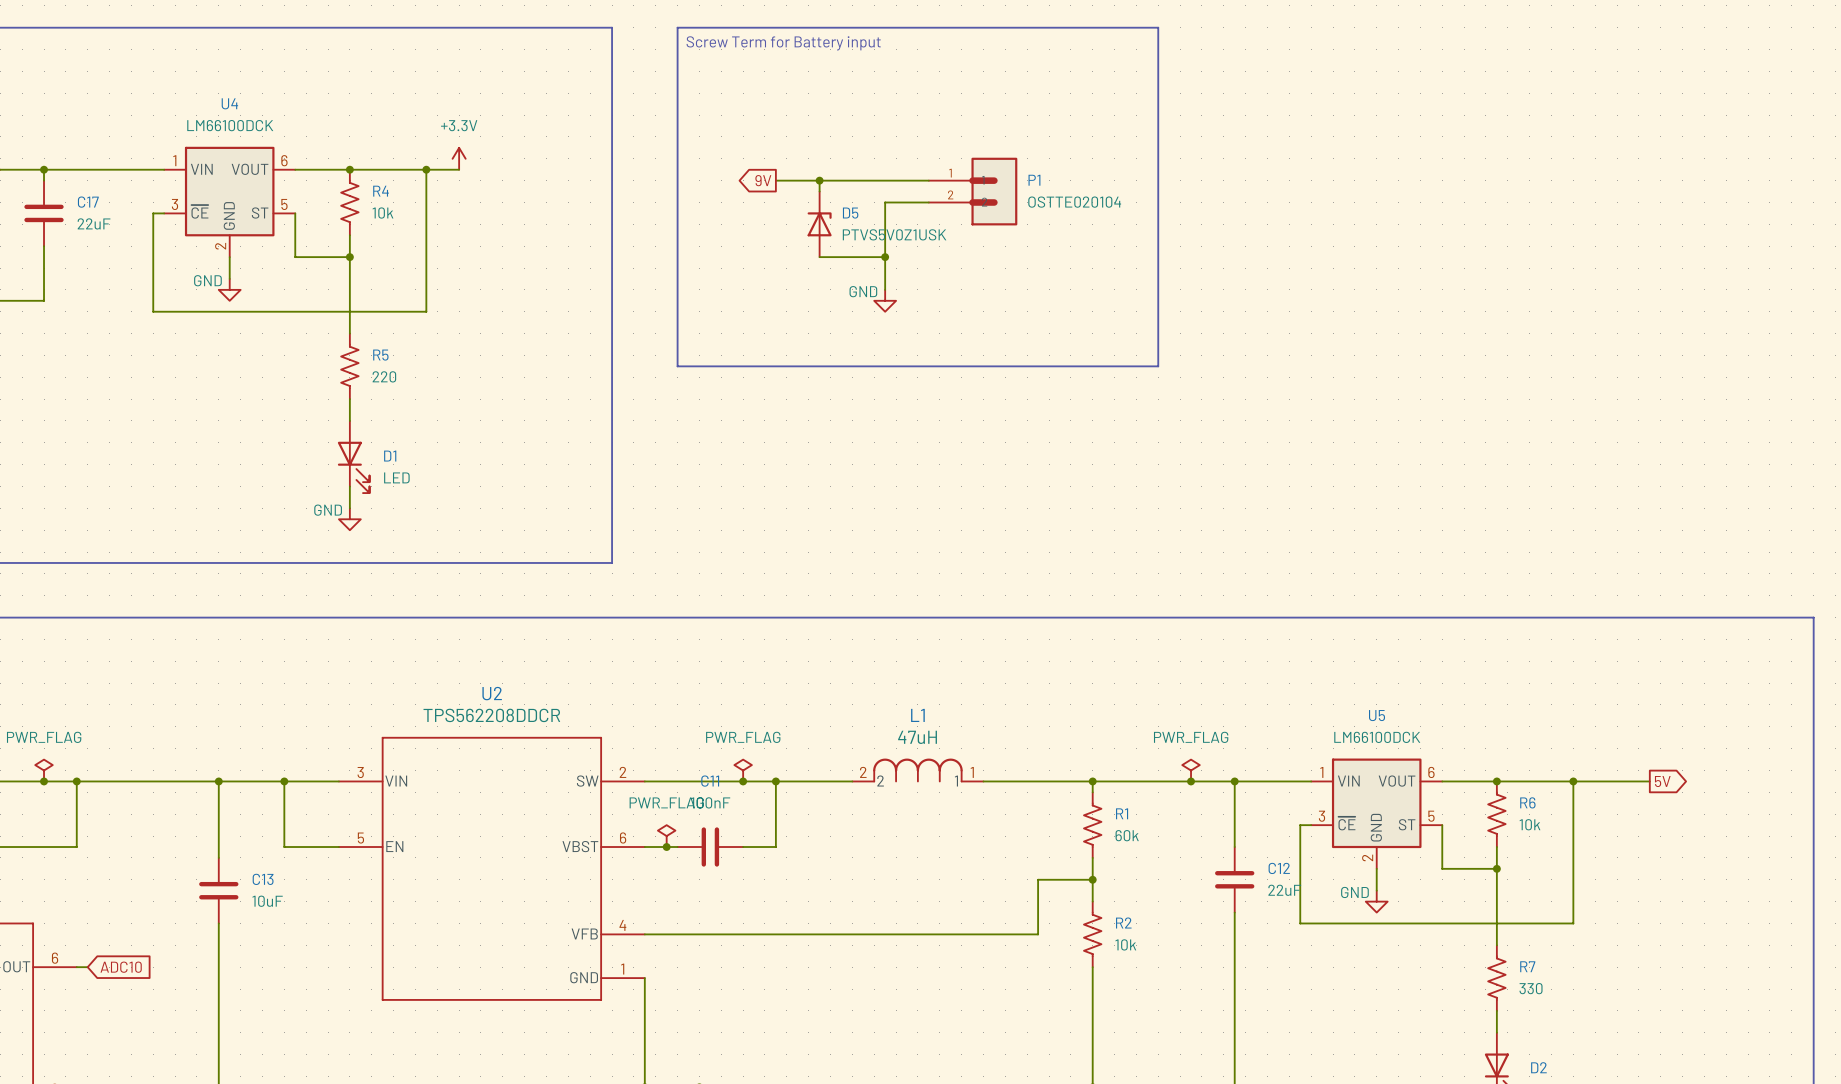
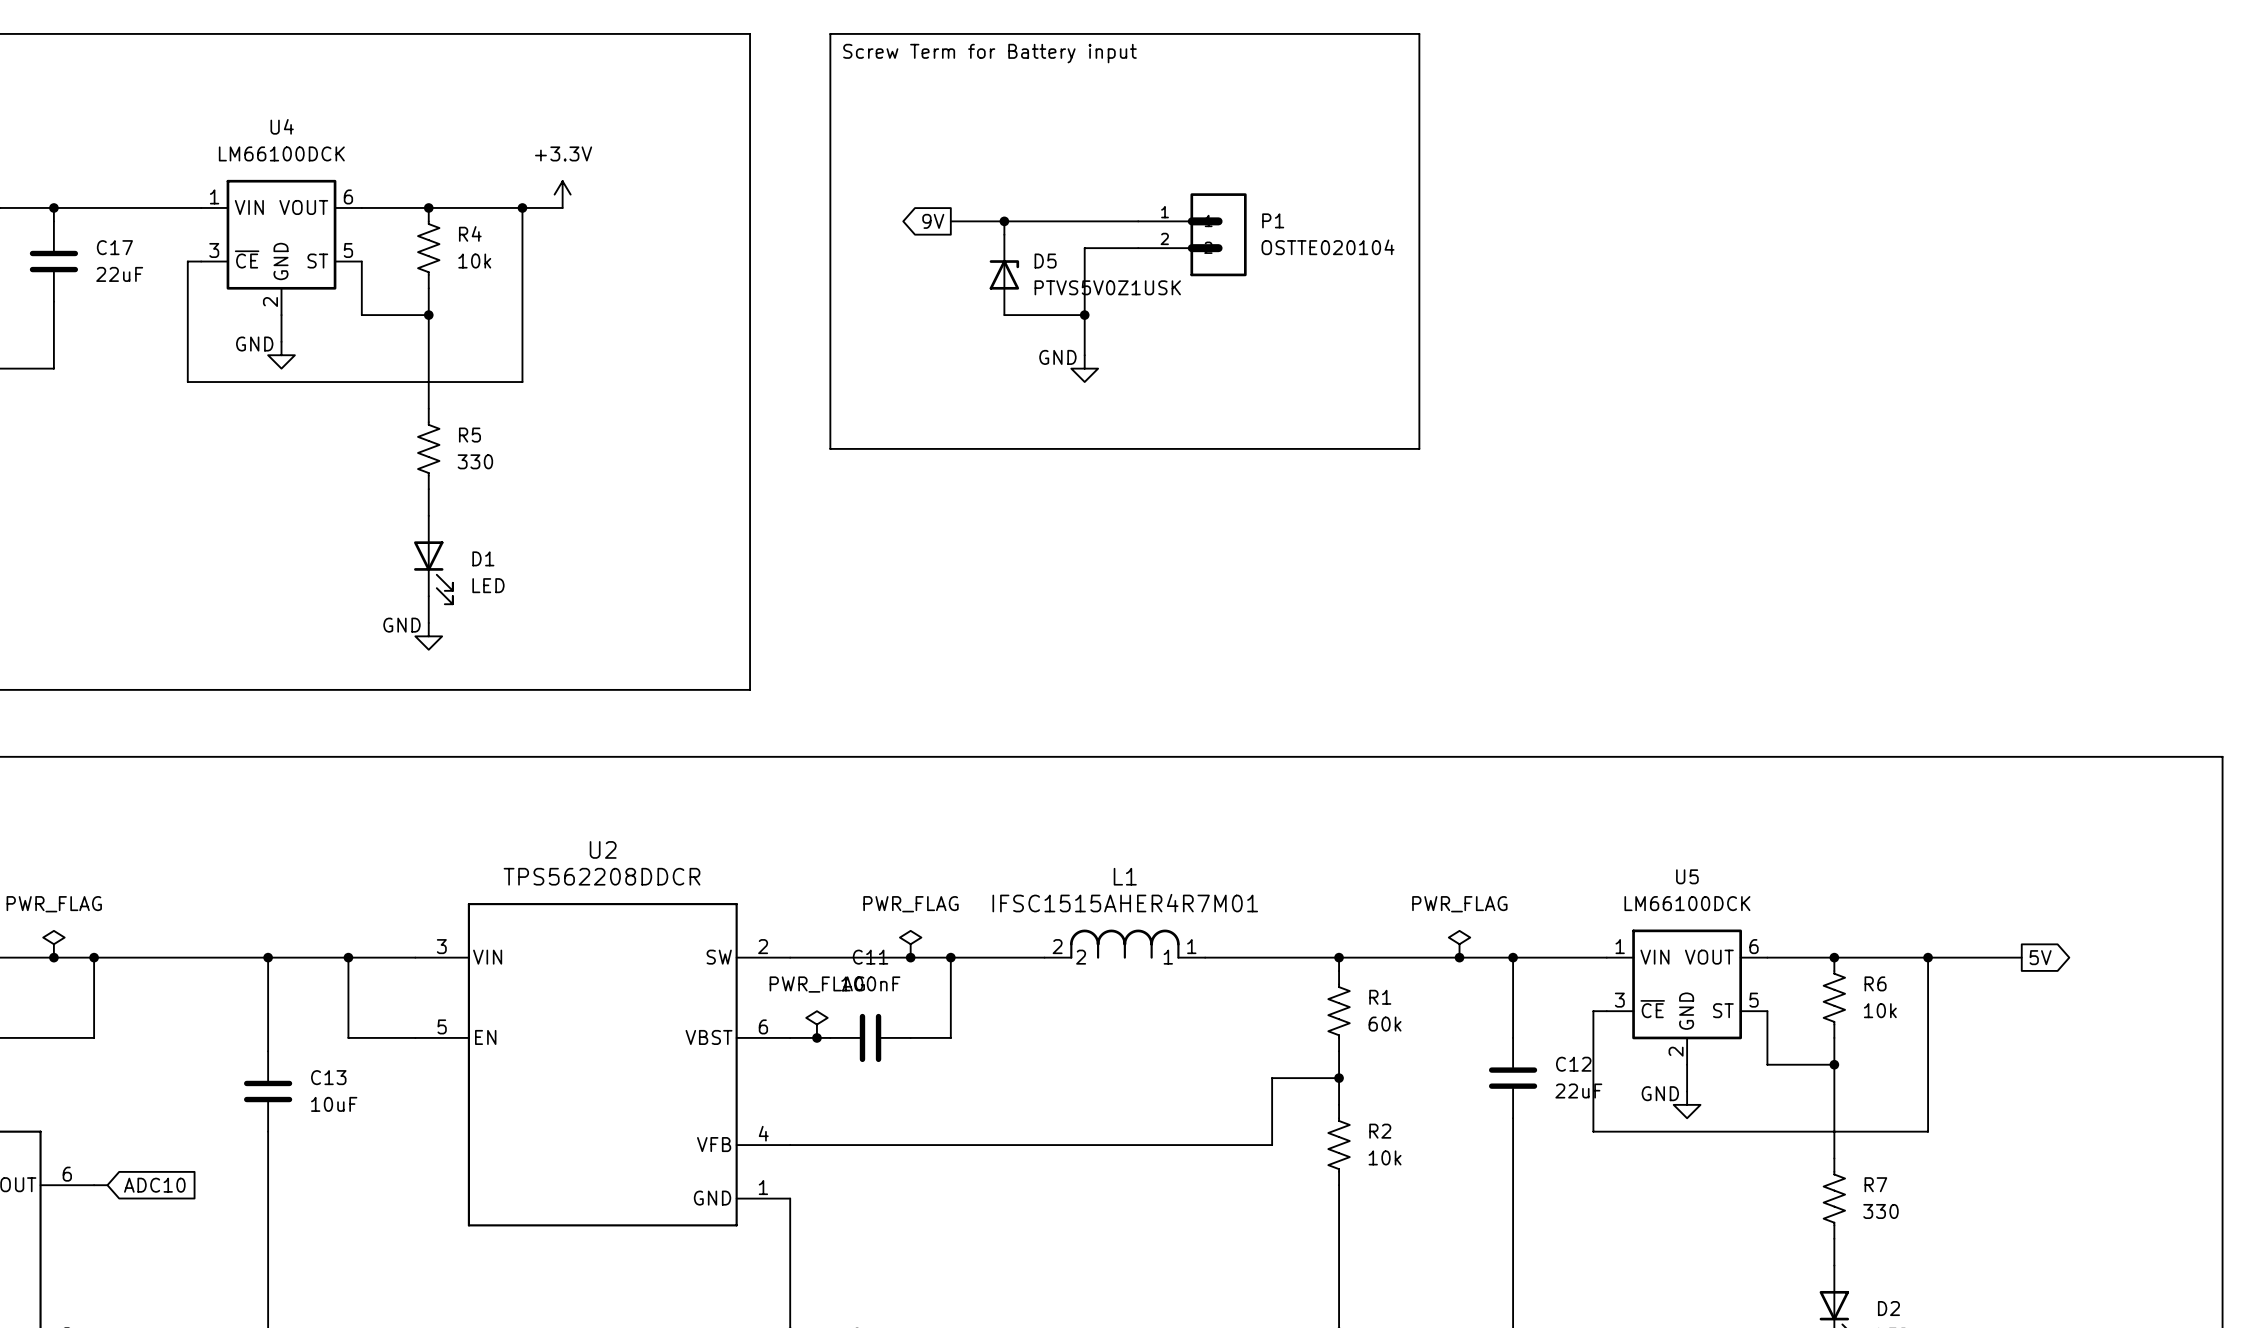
R5 value: 220 (384, 376) -> 330 (475, 461)
L1 value: 47uH (917, 737) -> IFSC1515AHER4R7M01 (1125, 903)

